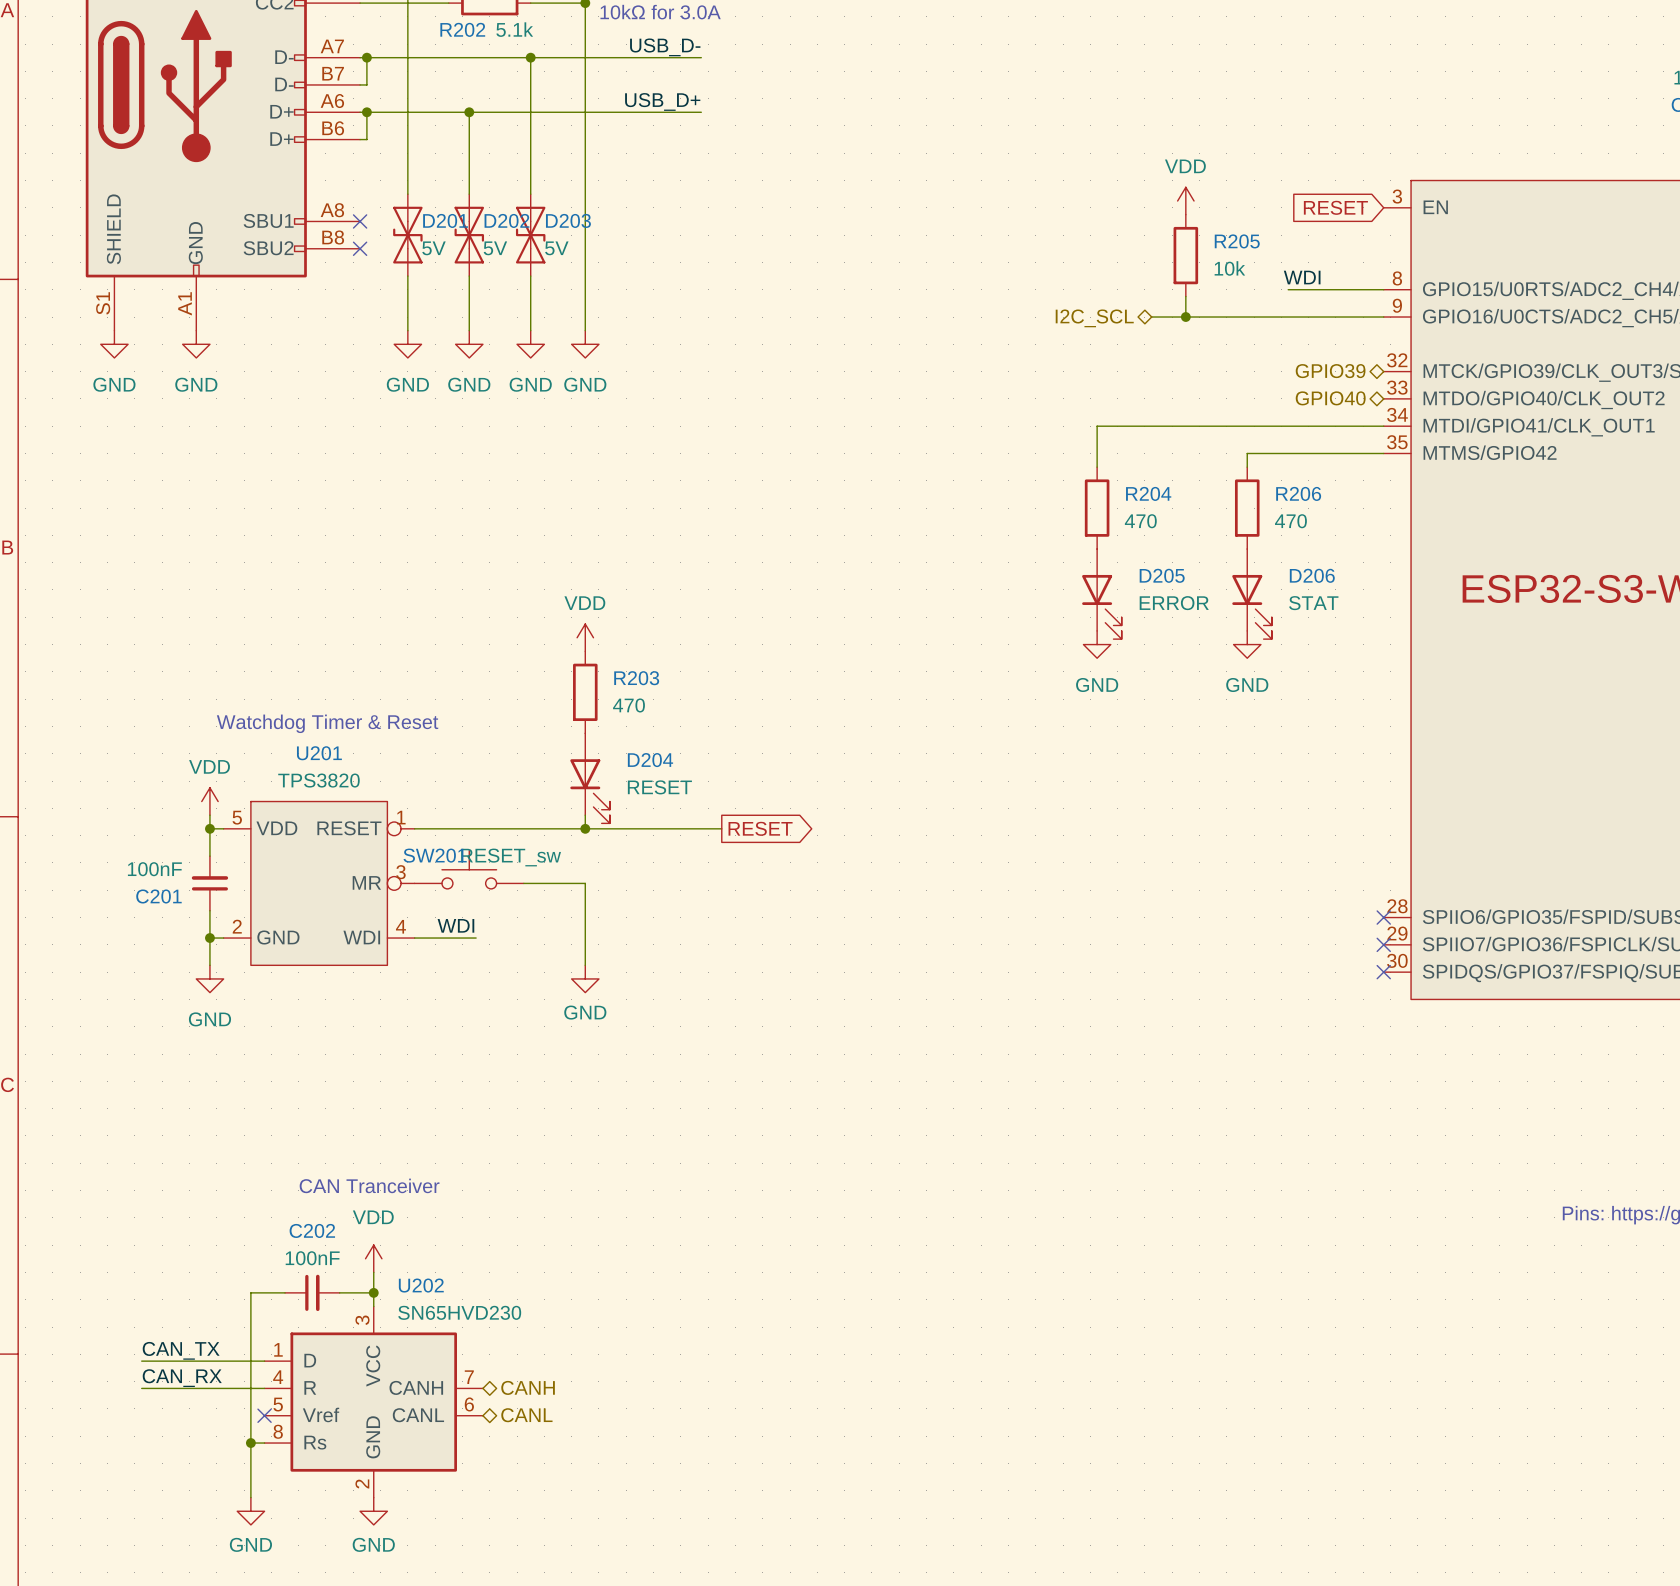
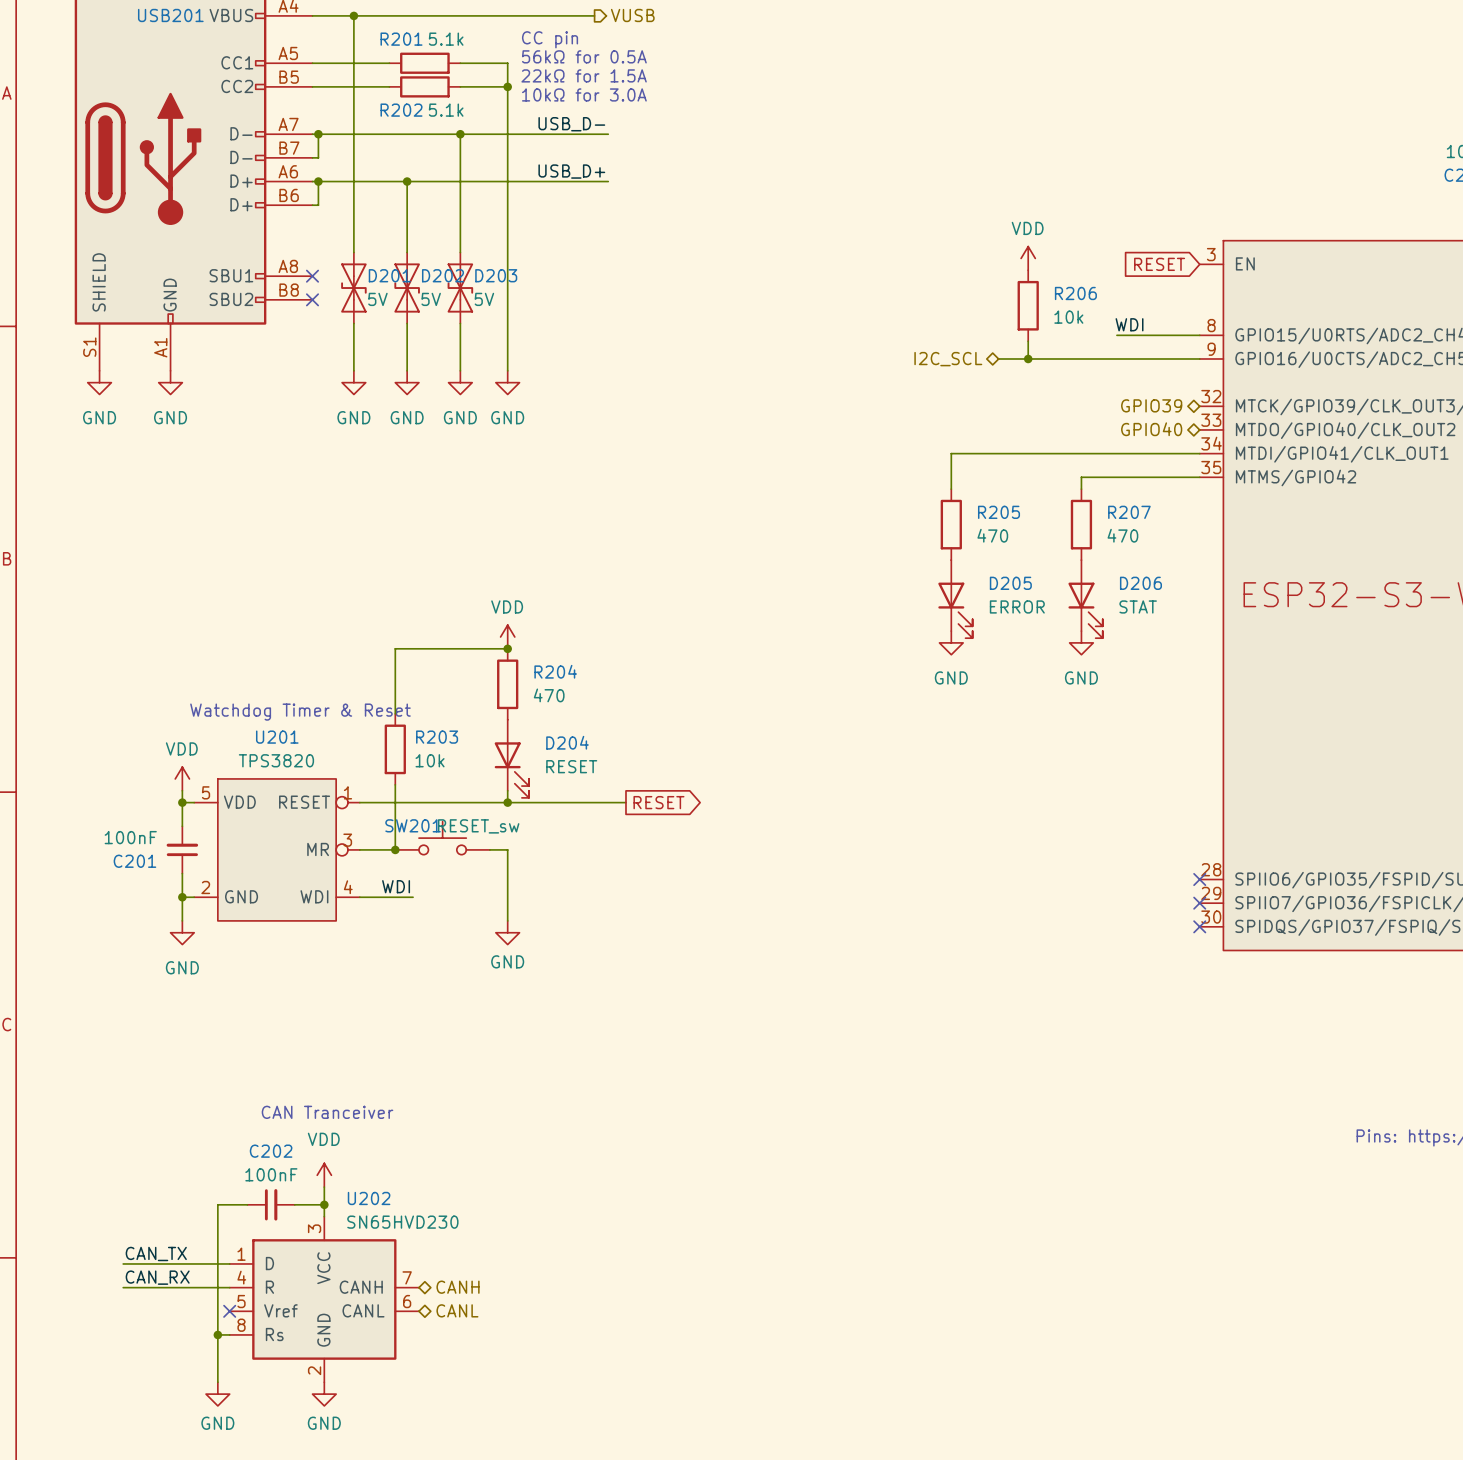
R205 name: R205 (1237, 241) -> R206 (1075, 293)
R204 name: R204 (1148, 493) -> R205 (999, 512)
R206 name: R206 (1298, 493) -> R207 (1129, 512)
wire: none -> (507, 648) (395, 648) (395, 713)
junction: none -> (507, 648)
R203 name: R203 (636, 678) -> R204 (555, 671)
R203: none -> 10k (395, 749)
wire: none -> (395, 784) (395, 849) (359, 849)
SW201 position: (469, 869) -> (442, 838)
junction: none -> (395, 849)

